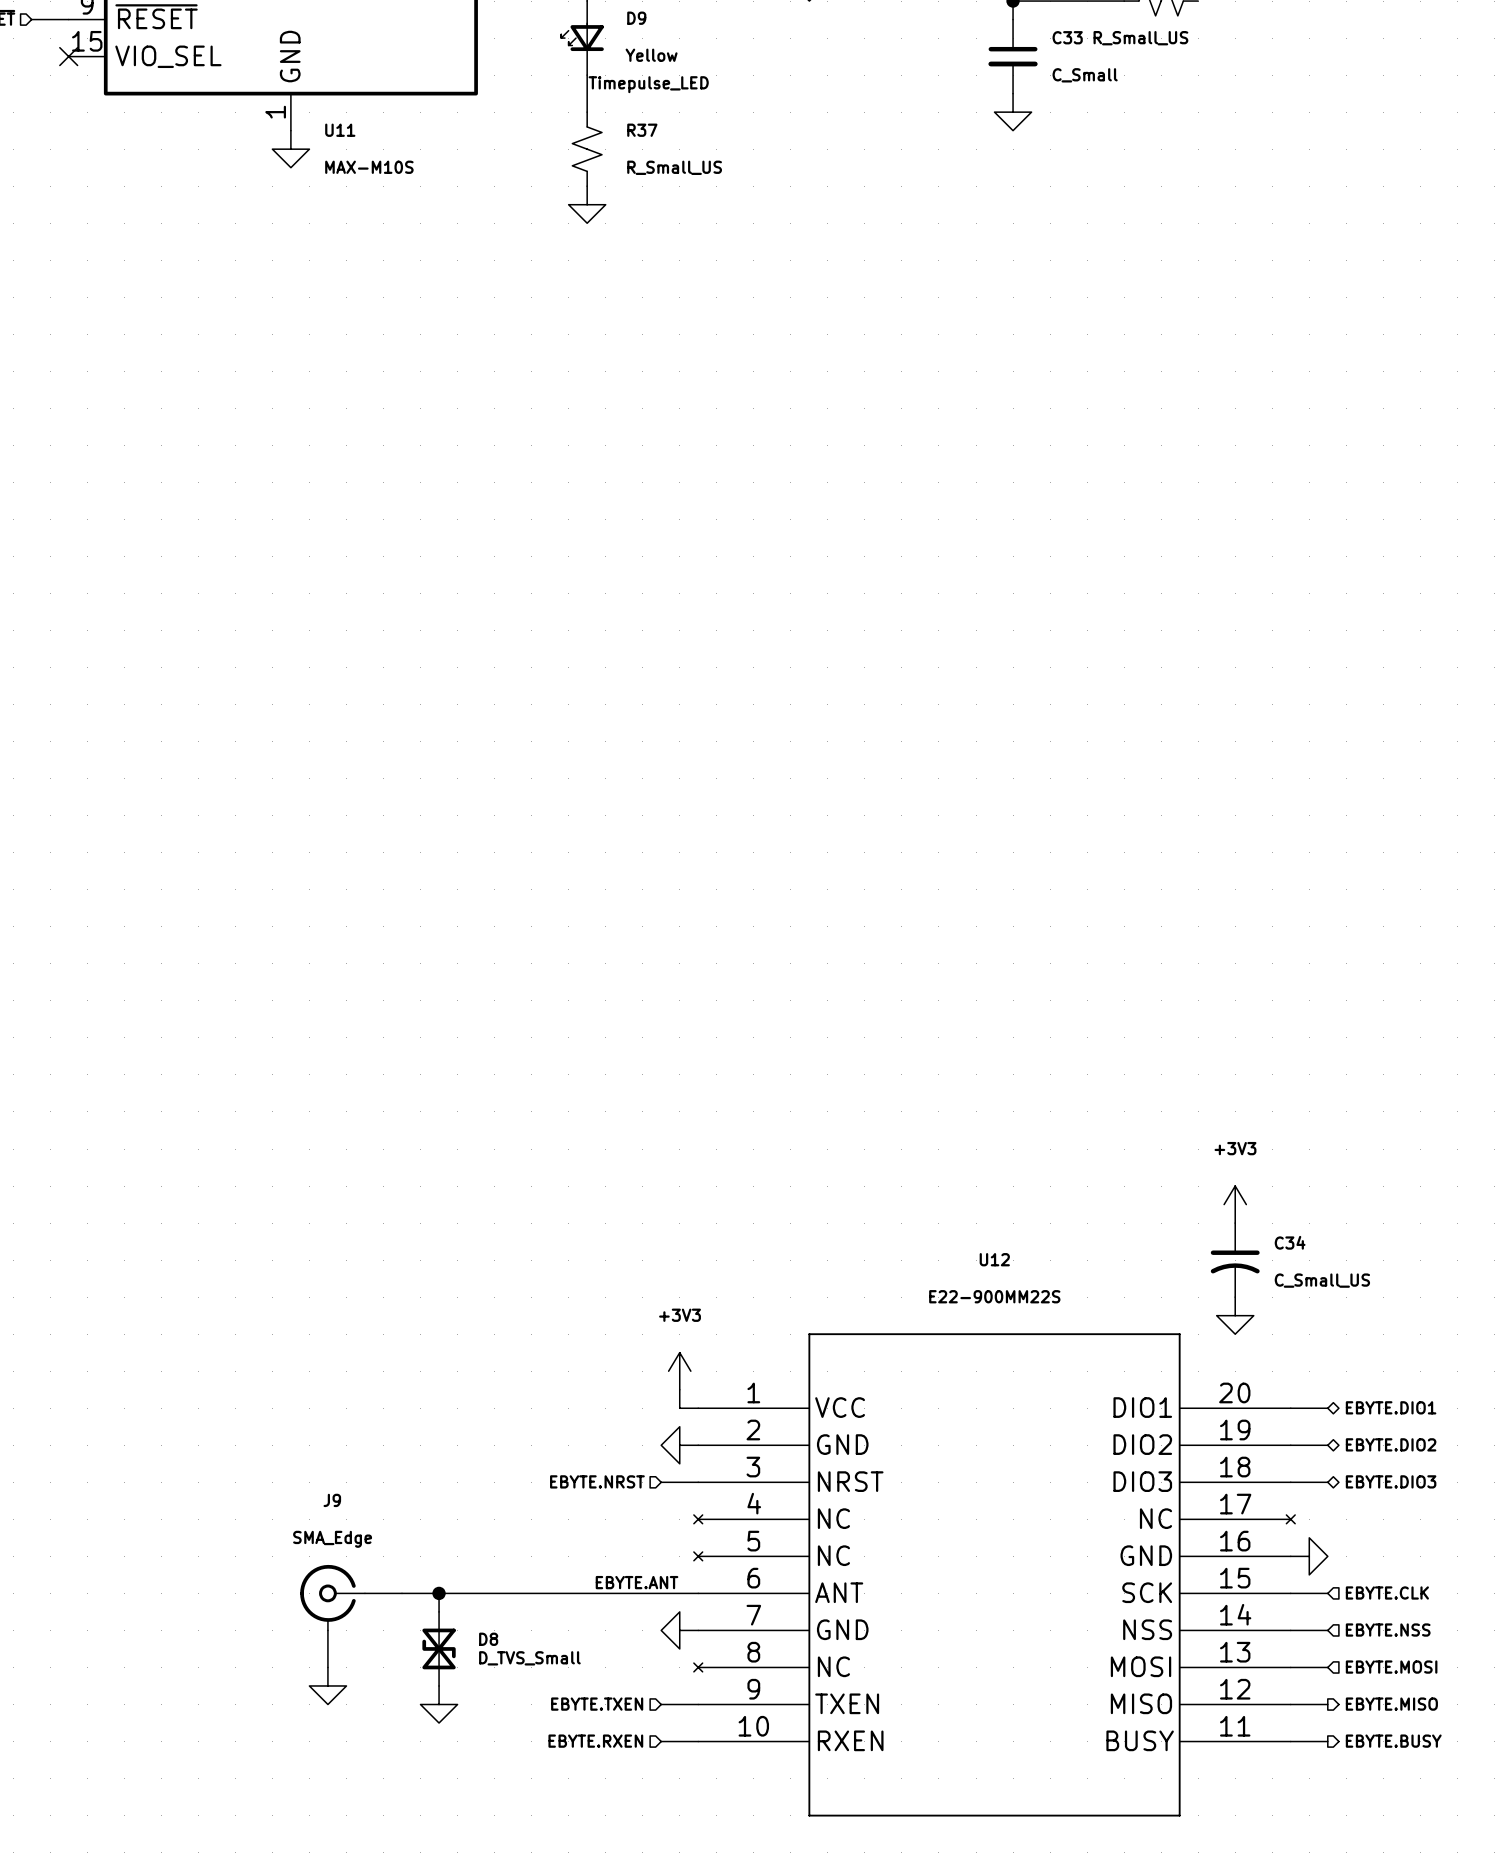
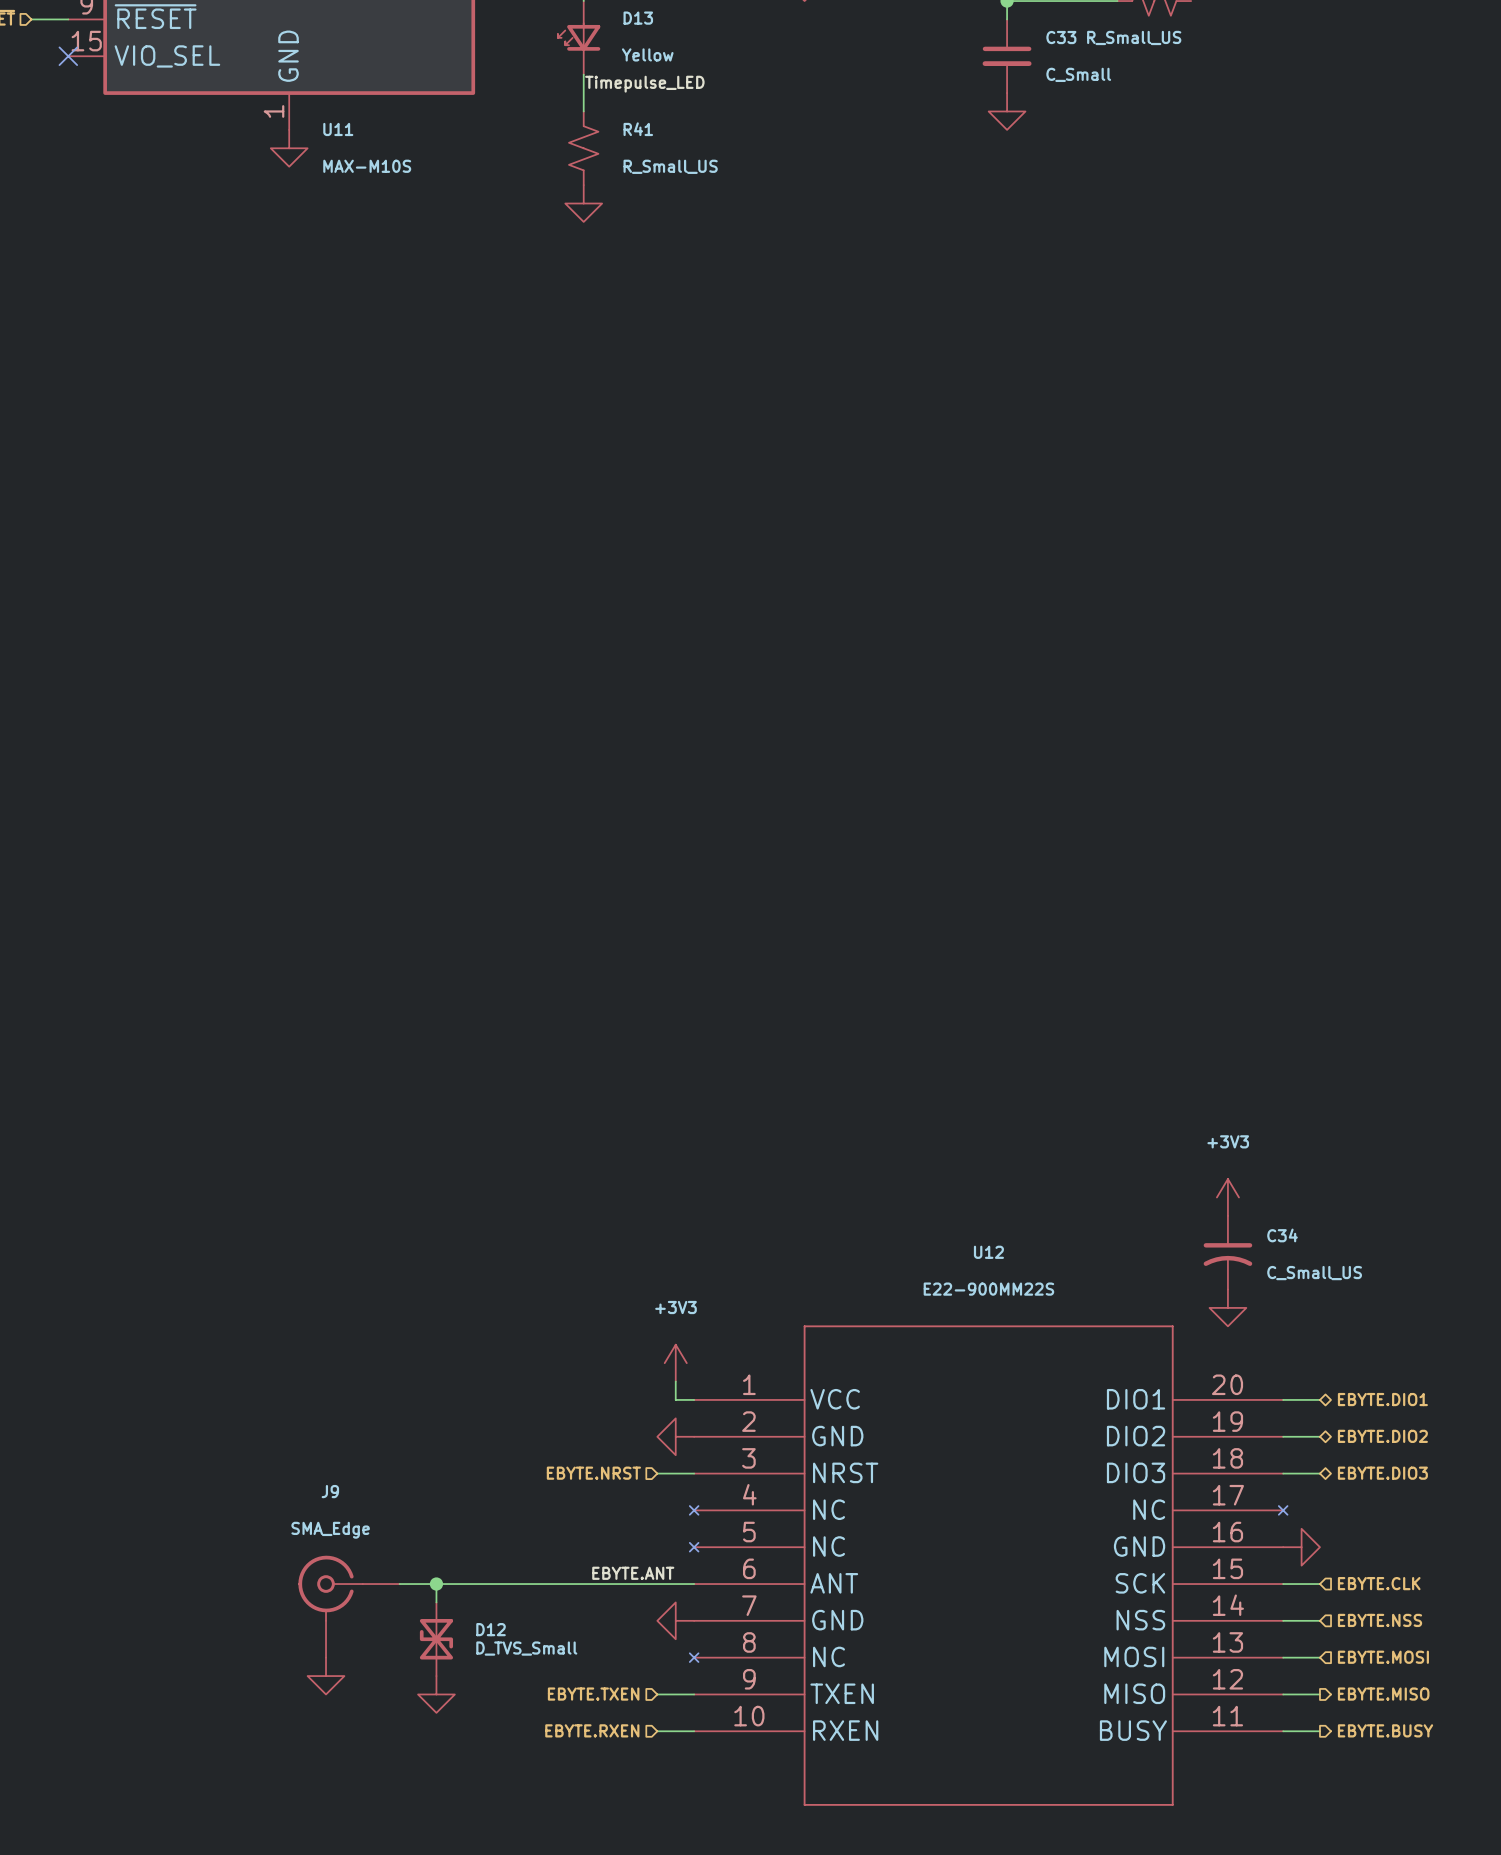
D9 name: D9 (636, 18) -> D13 (638, 18)
R37 name: R37 (642, 130) -> R41 (638, 129)
D8 name: D8 (488, 1639) -> D12 (491, 1629)

